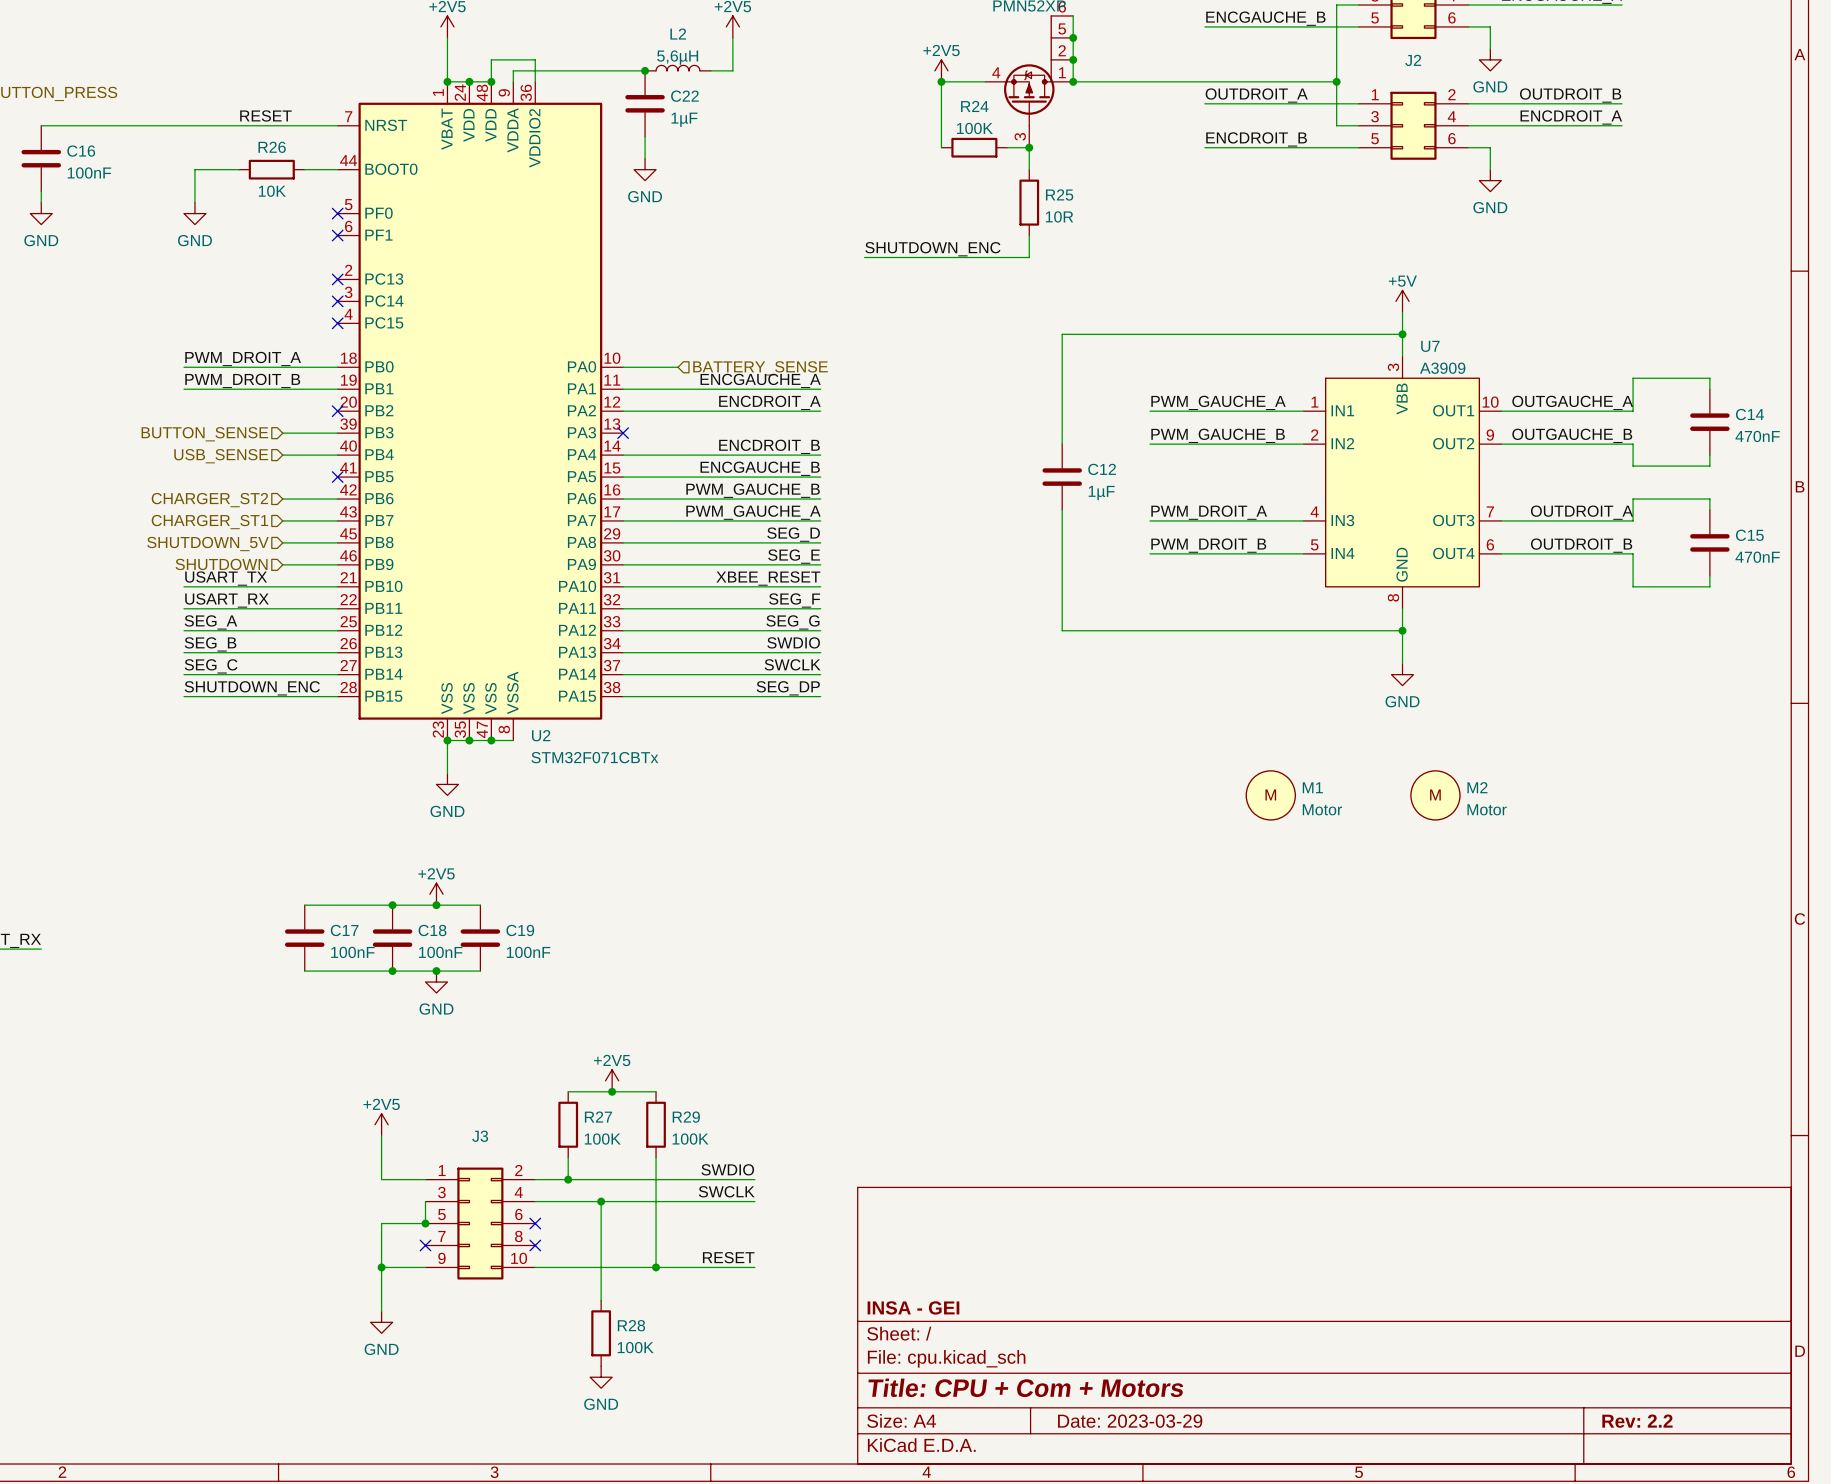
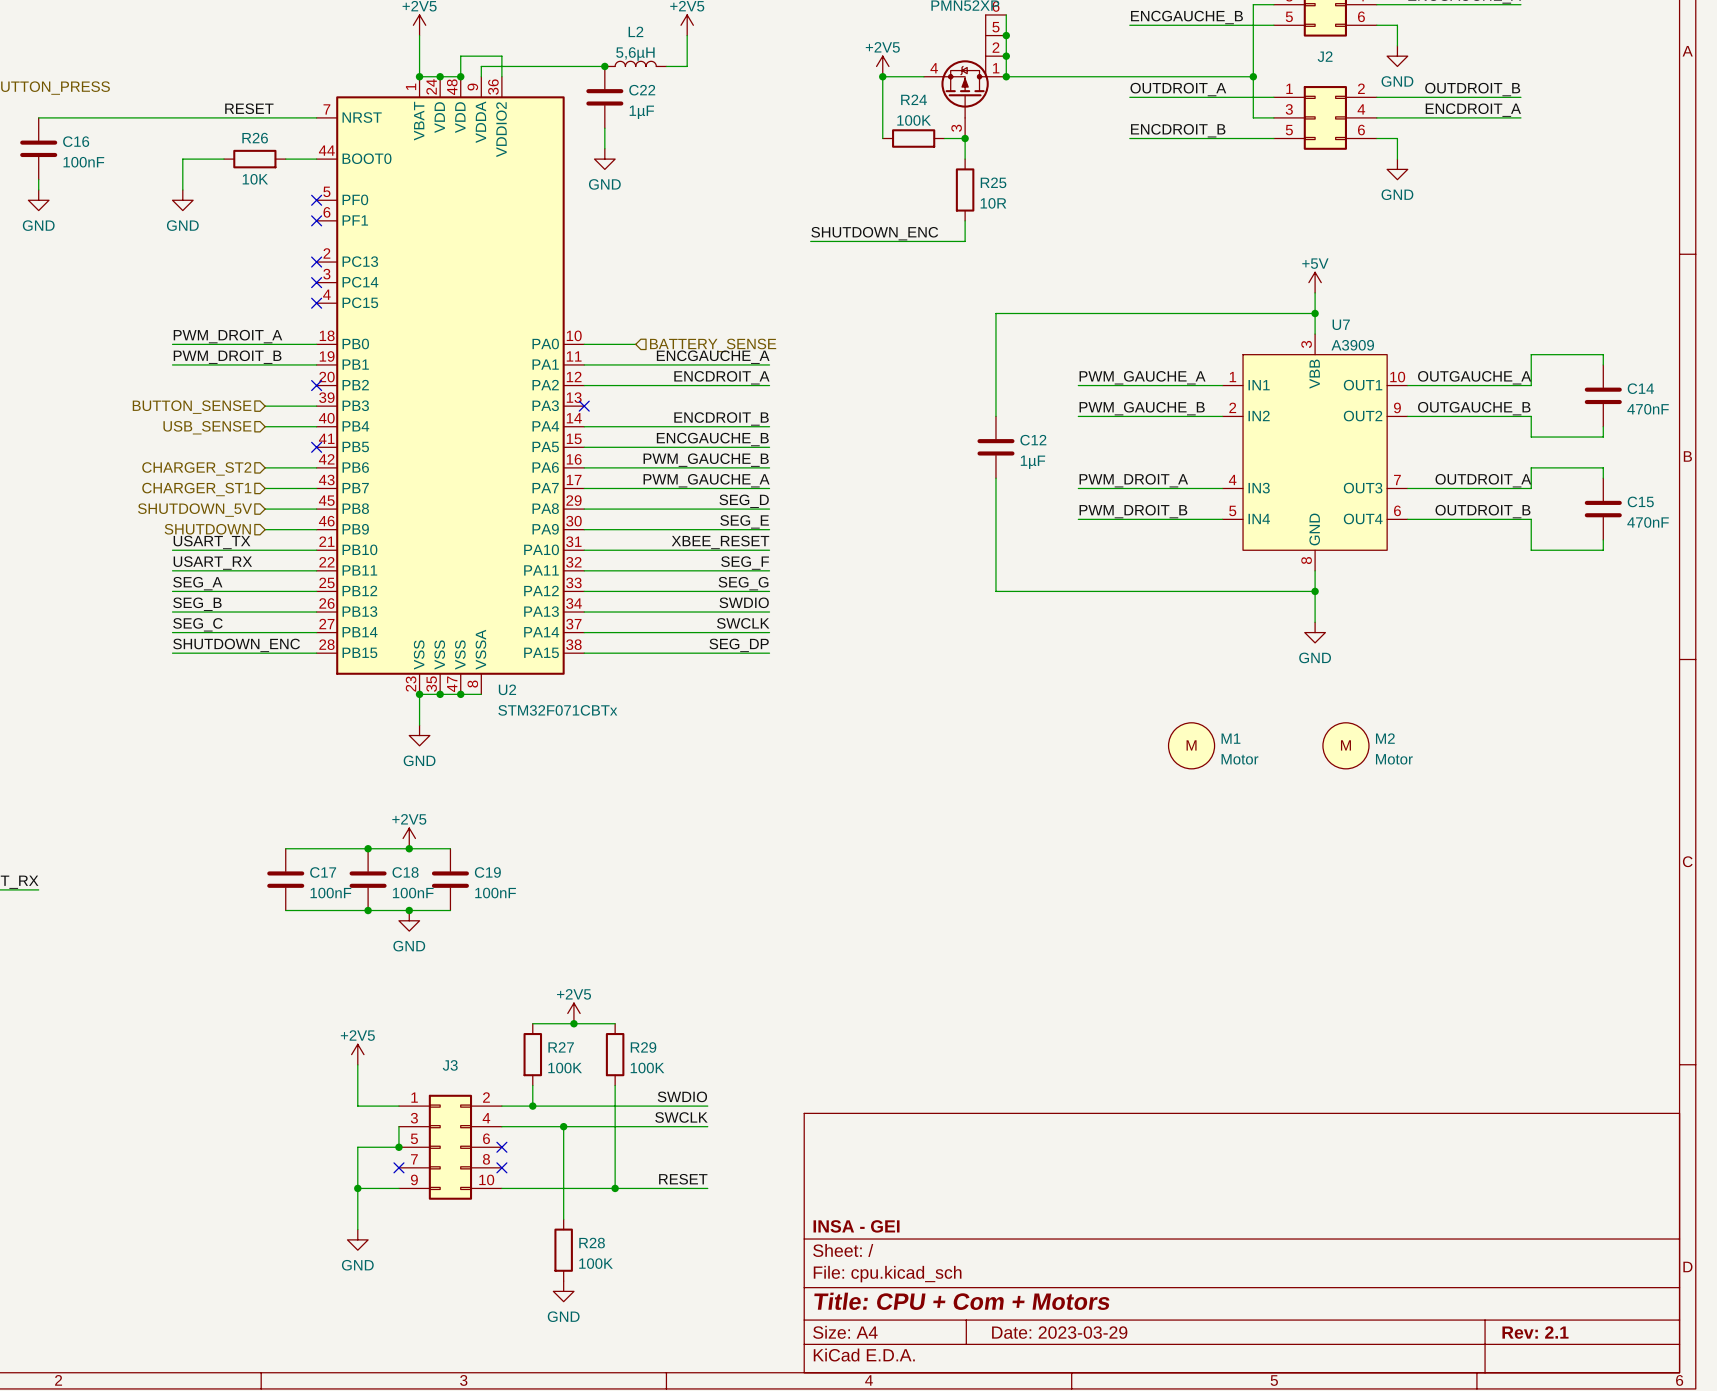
title block: Rev: 2.2 (1637, 1421) -> Rev: 2.1 (1535, 1332)

